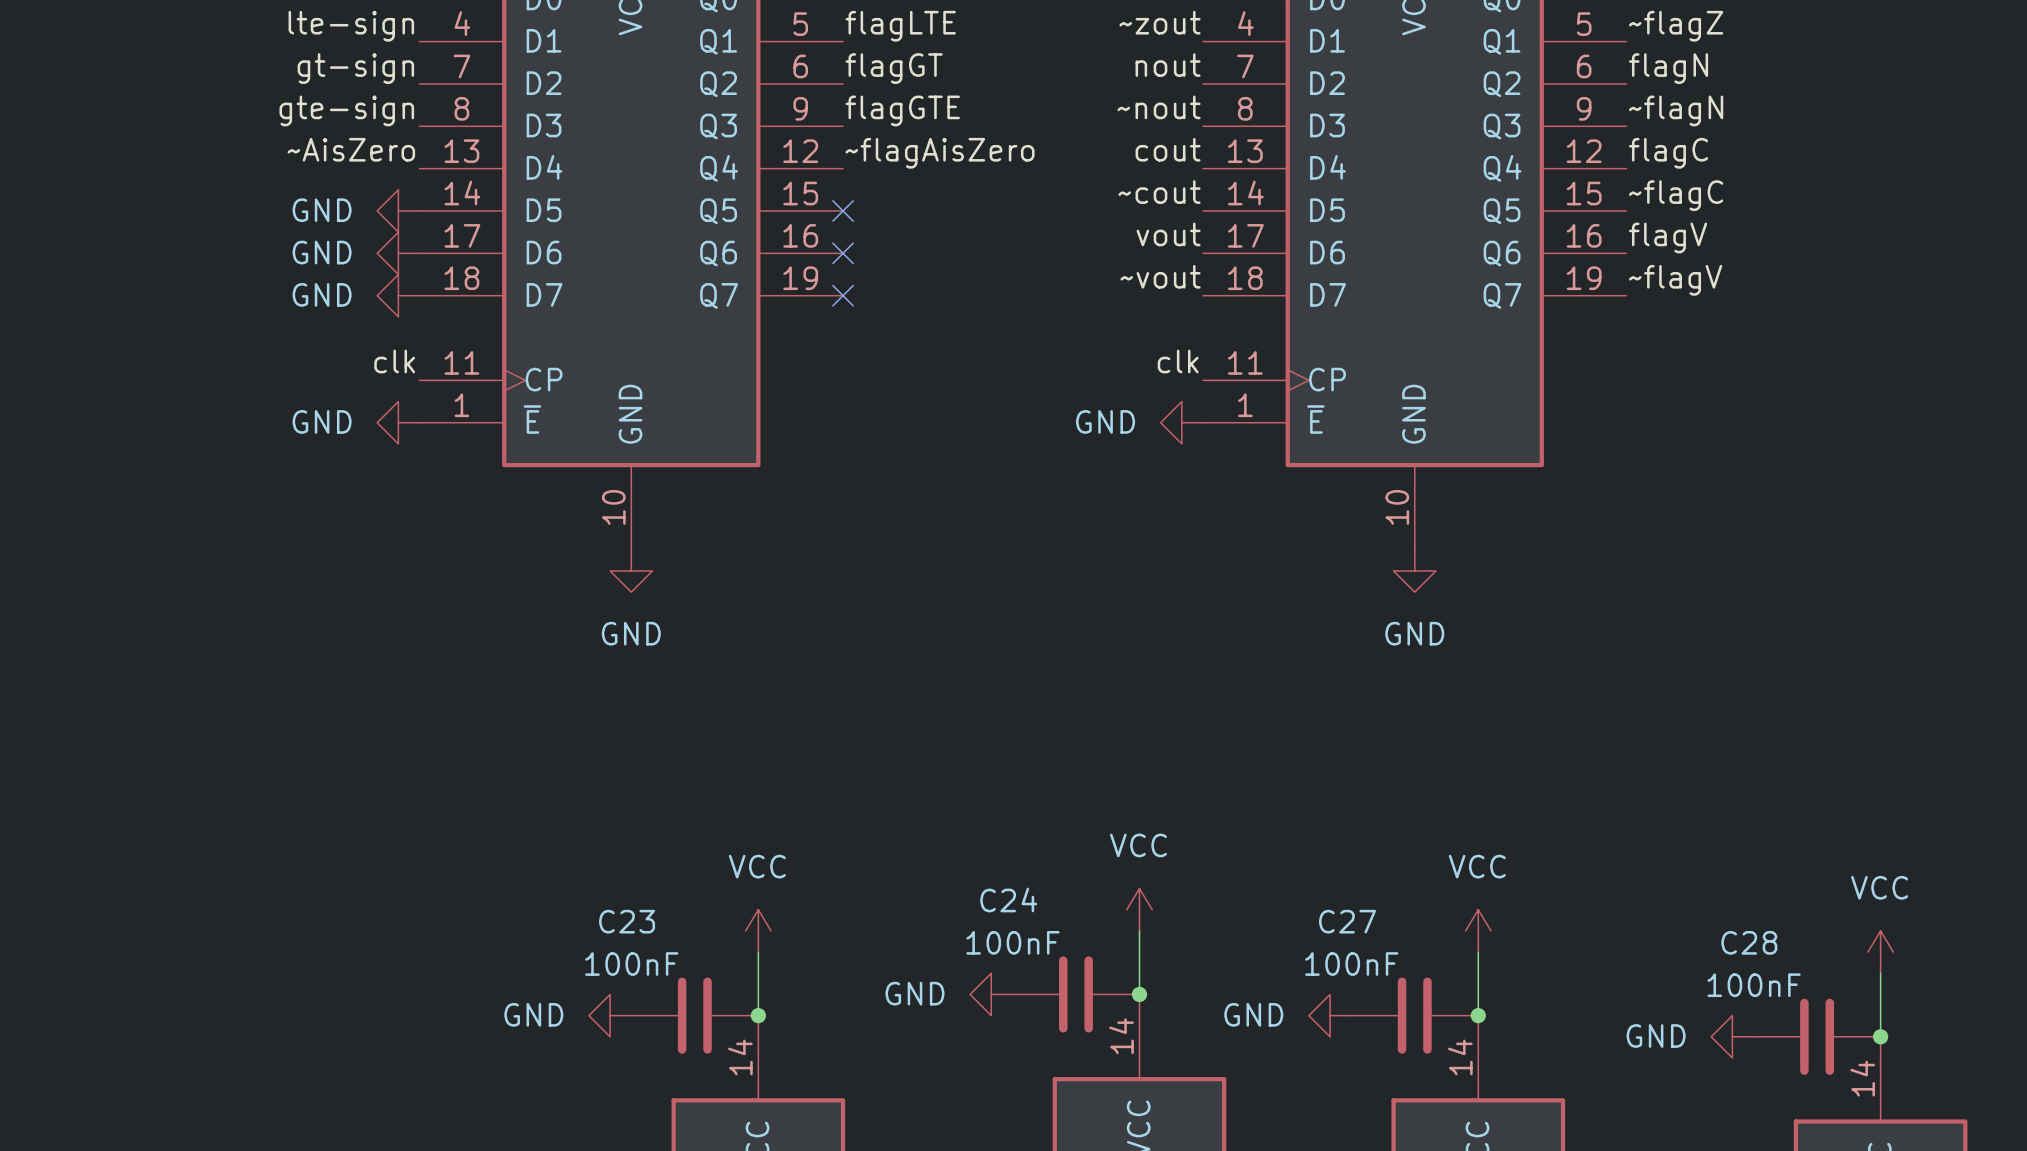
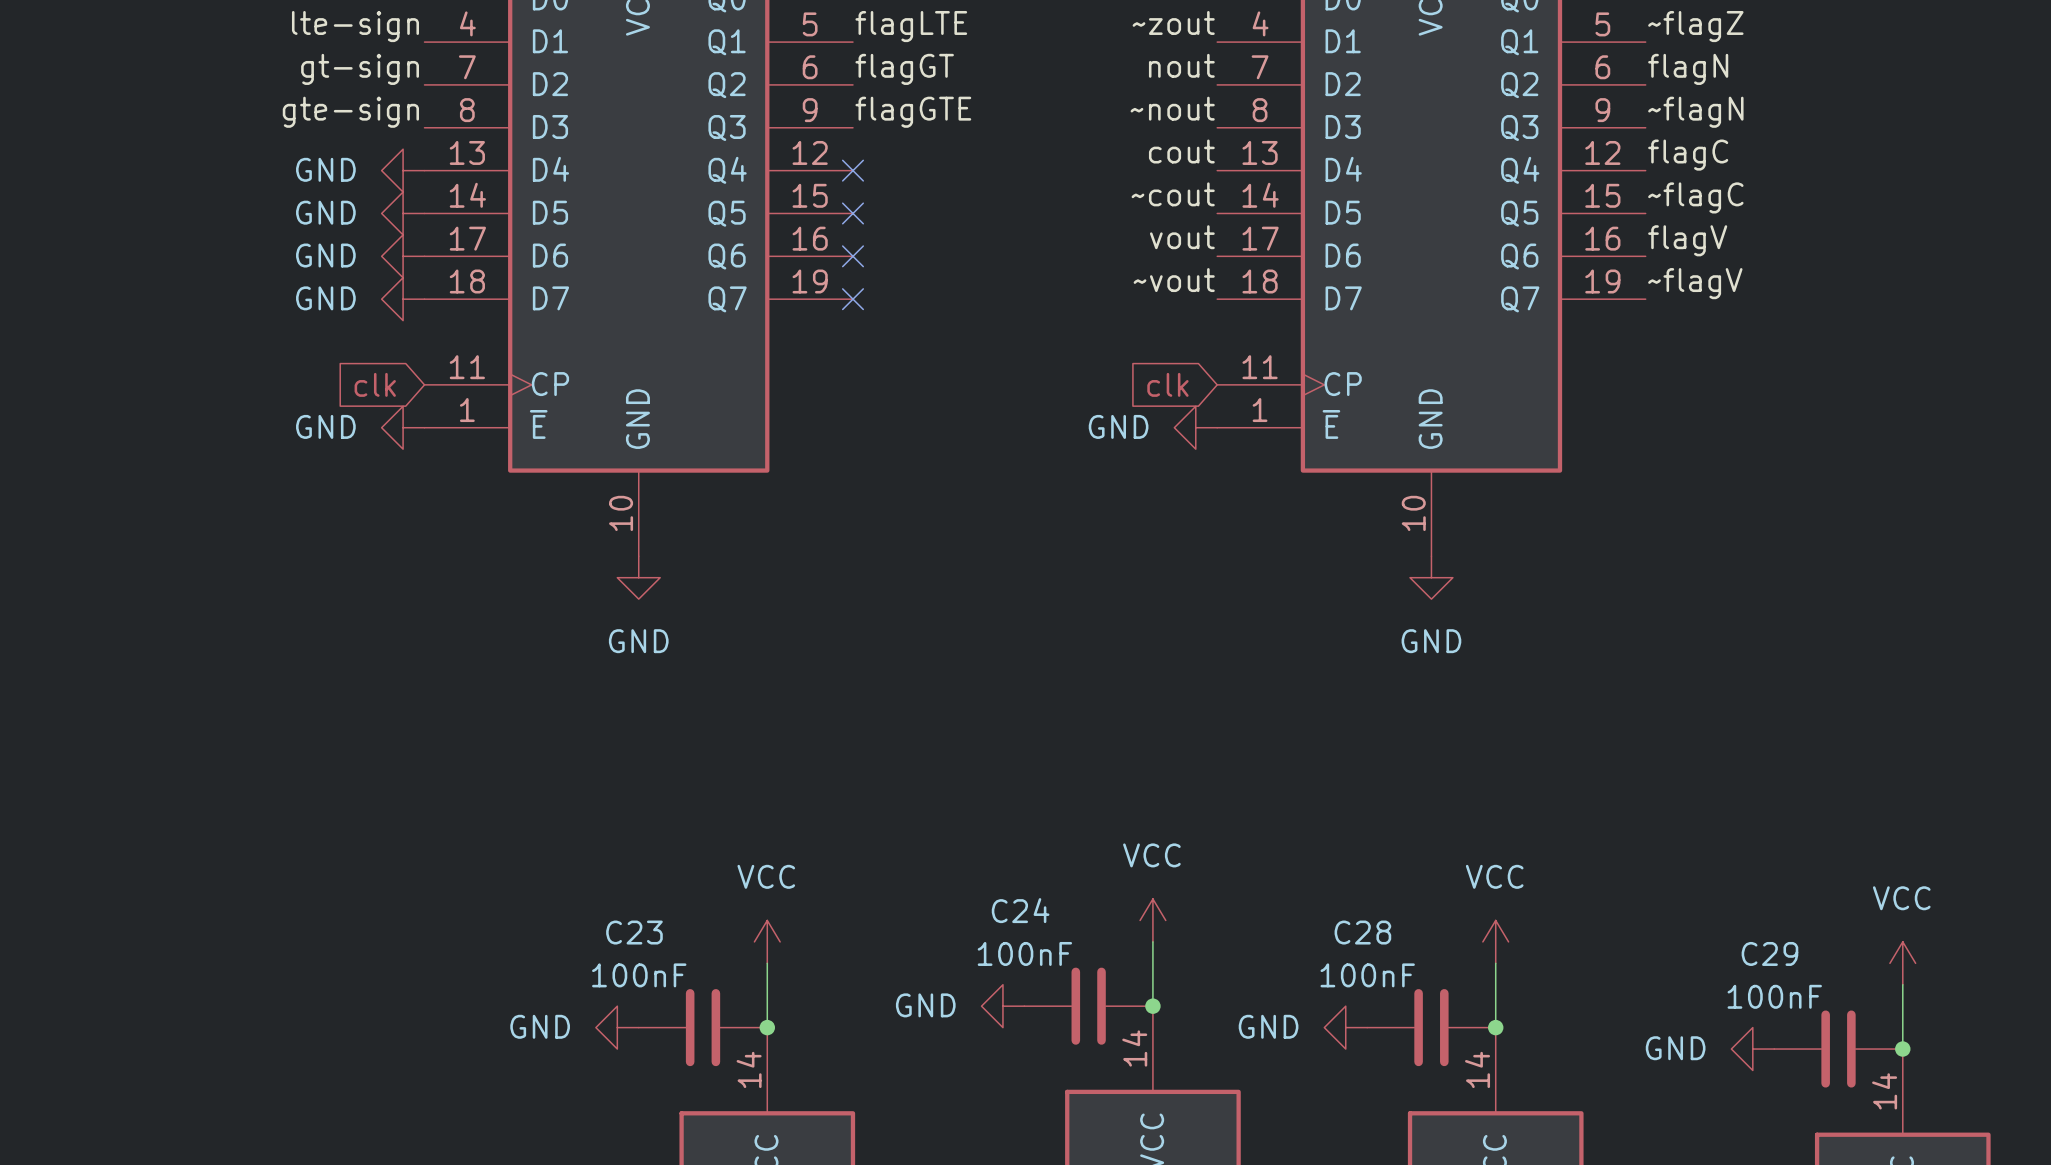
label: ~AisZero (351, 149) -> none
label: ~flagAisZero (940, 153) -> none
power symbol: none -> GND (403, 170)
no-connect mark: none -> (852, 170)
label: clk (394, 361) -> none
label: clk (1178, 361) -> none
global label: none -> clk (375, 384)
global label: none -> clk (1167, 384)
C27 name: C27 (1347, 921) -> C28 (1362, 932)
C28 name: C28 (1749, 942) -> C29 (1769, 953)

